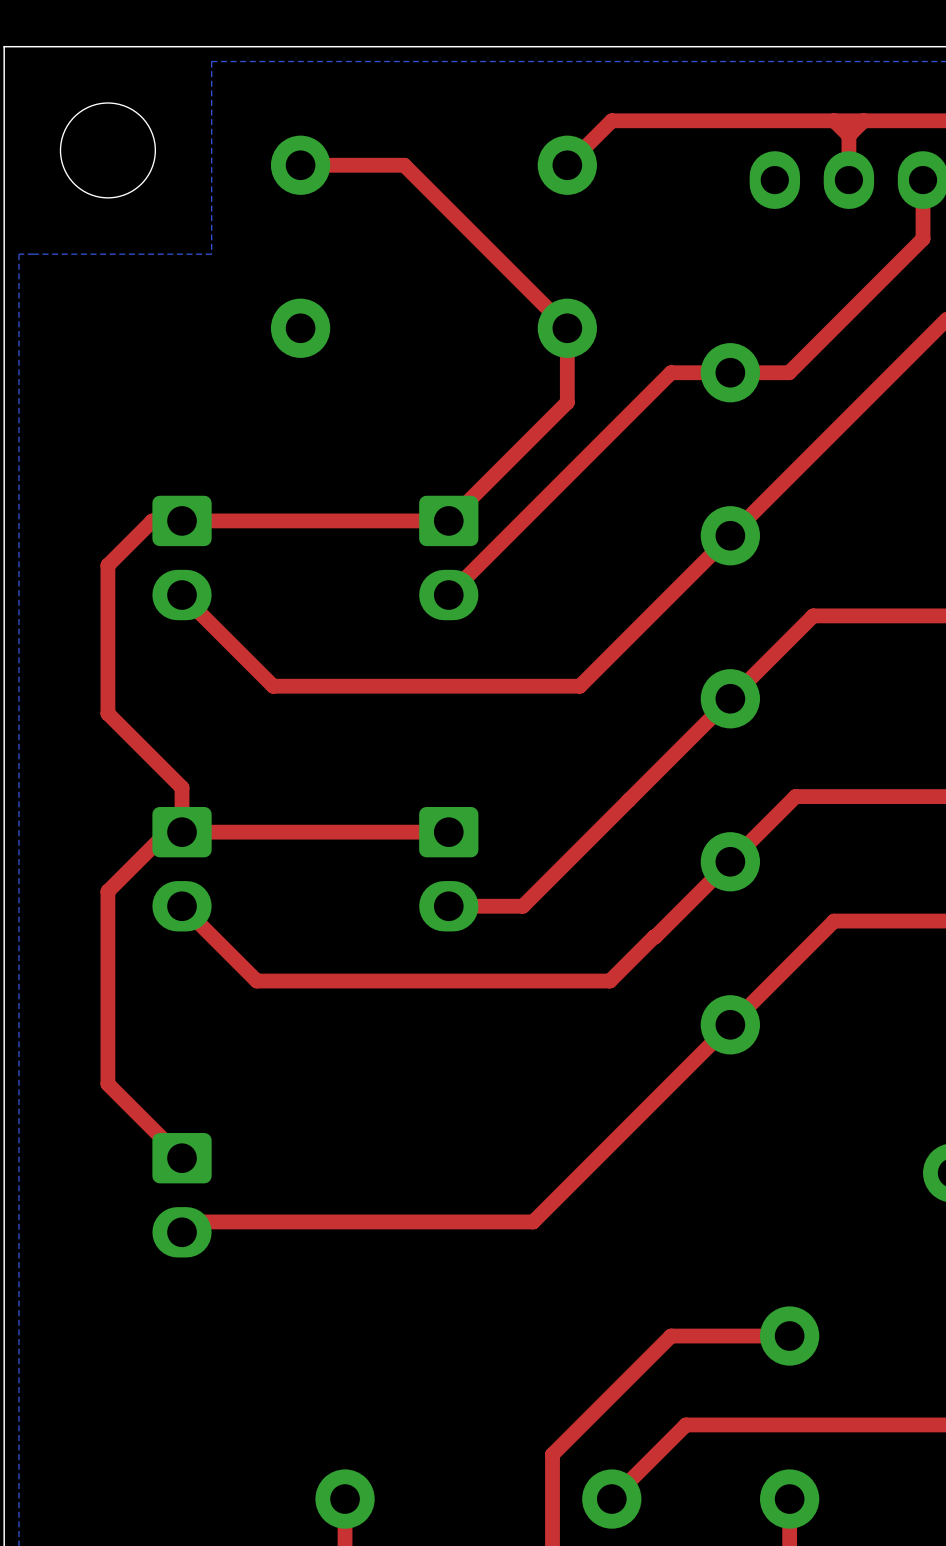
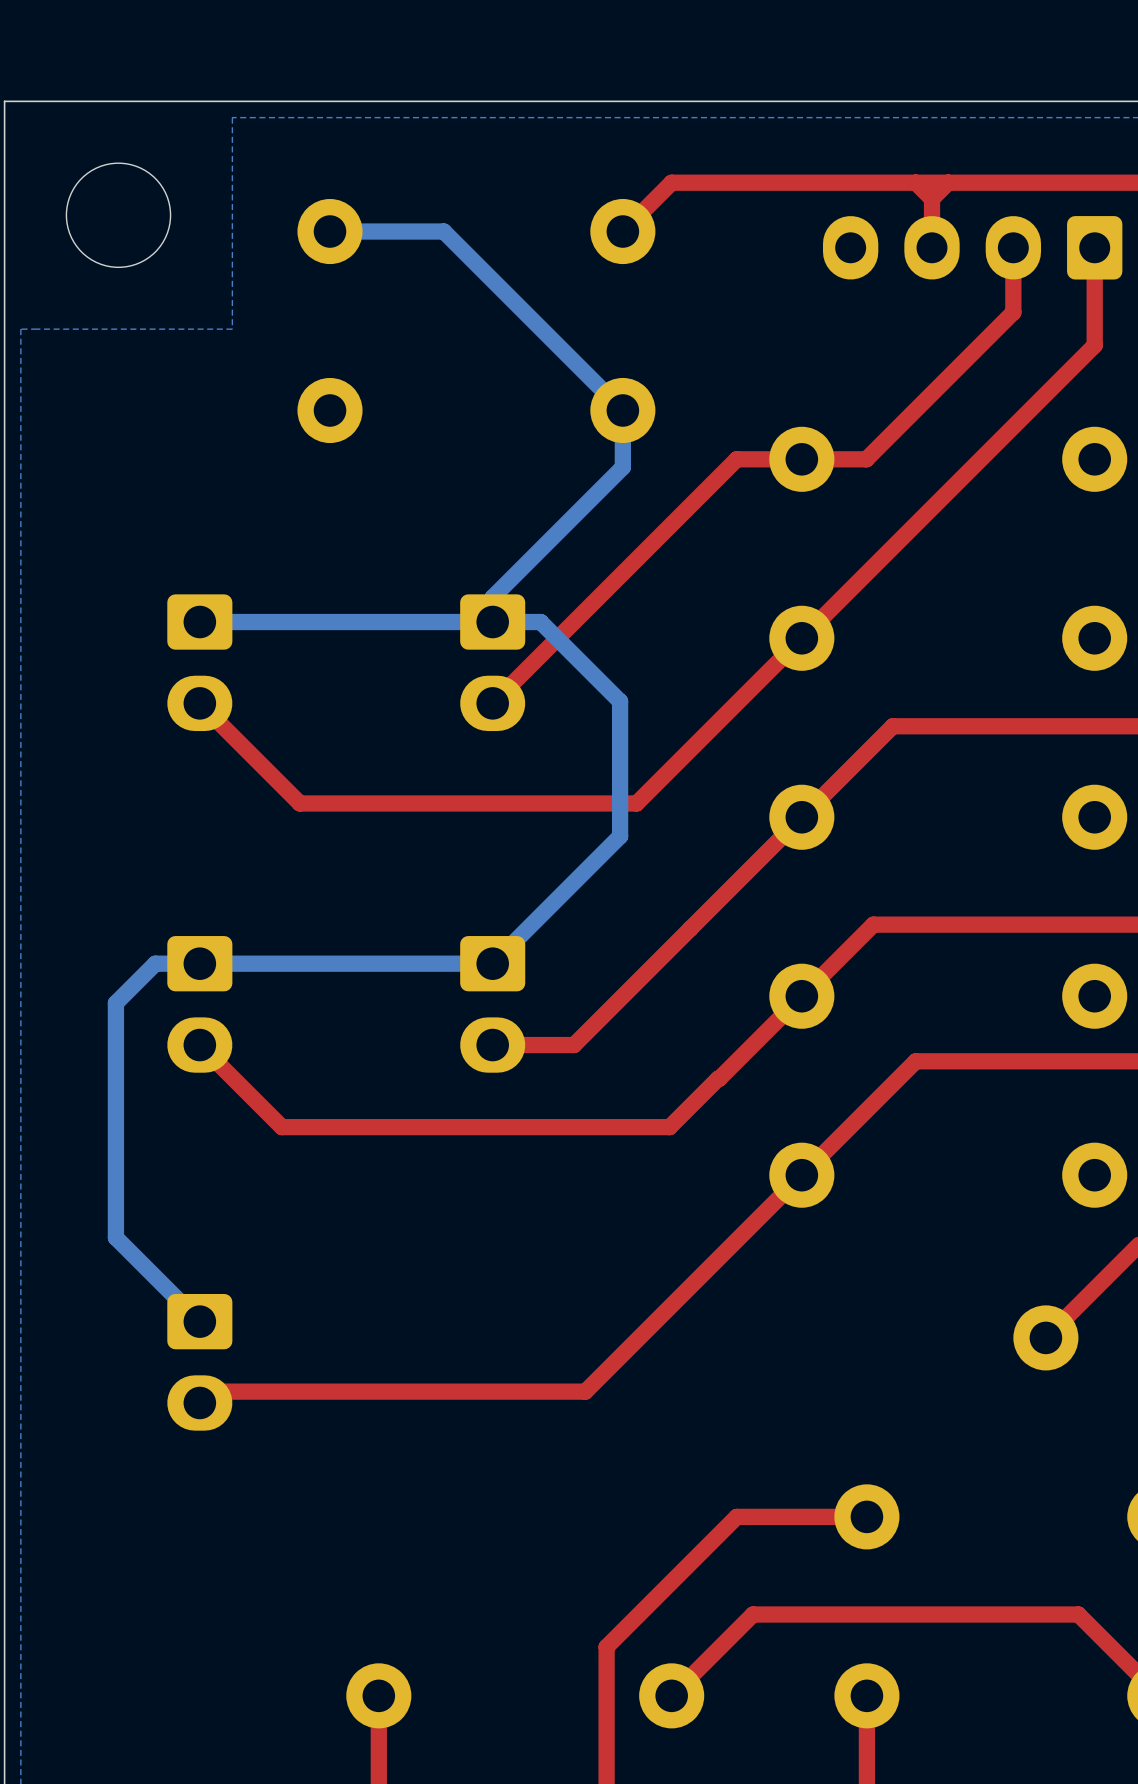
top track: (300, 165) (404, 165) (567, 328) (567, 402) (448, 520) (152, 520) (107, 565) (107, 713) (182, 787) (182, 832) -> none
bottom track: none -> (330, 231) (443, 231) (622, 410) (622, 467) (492, 597) (492, 622)
bottom track: none -> (199, 622) (540, 622) (620, 701) (620, 836) (492, 963) (155, 963) (115, 1003) (115, 1237) (199, 1321)
top track: (448, 832) (167, 832) (107, 891) (107, 1084) (182, 1158) -> none

